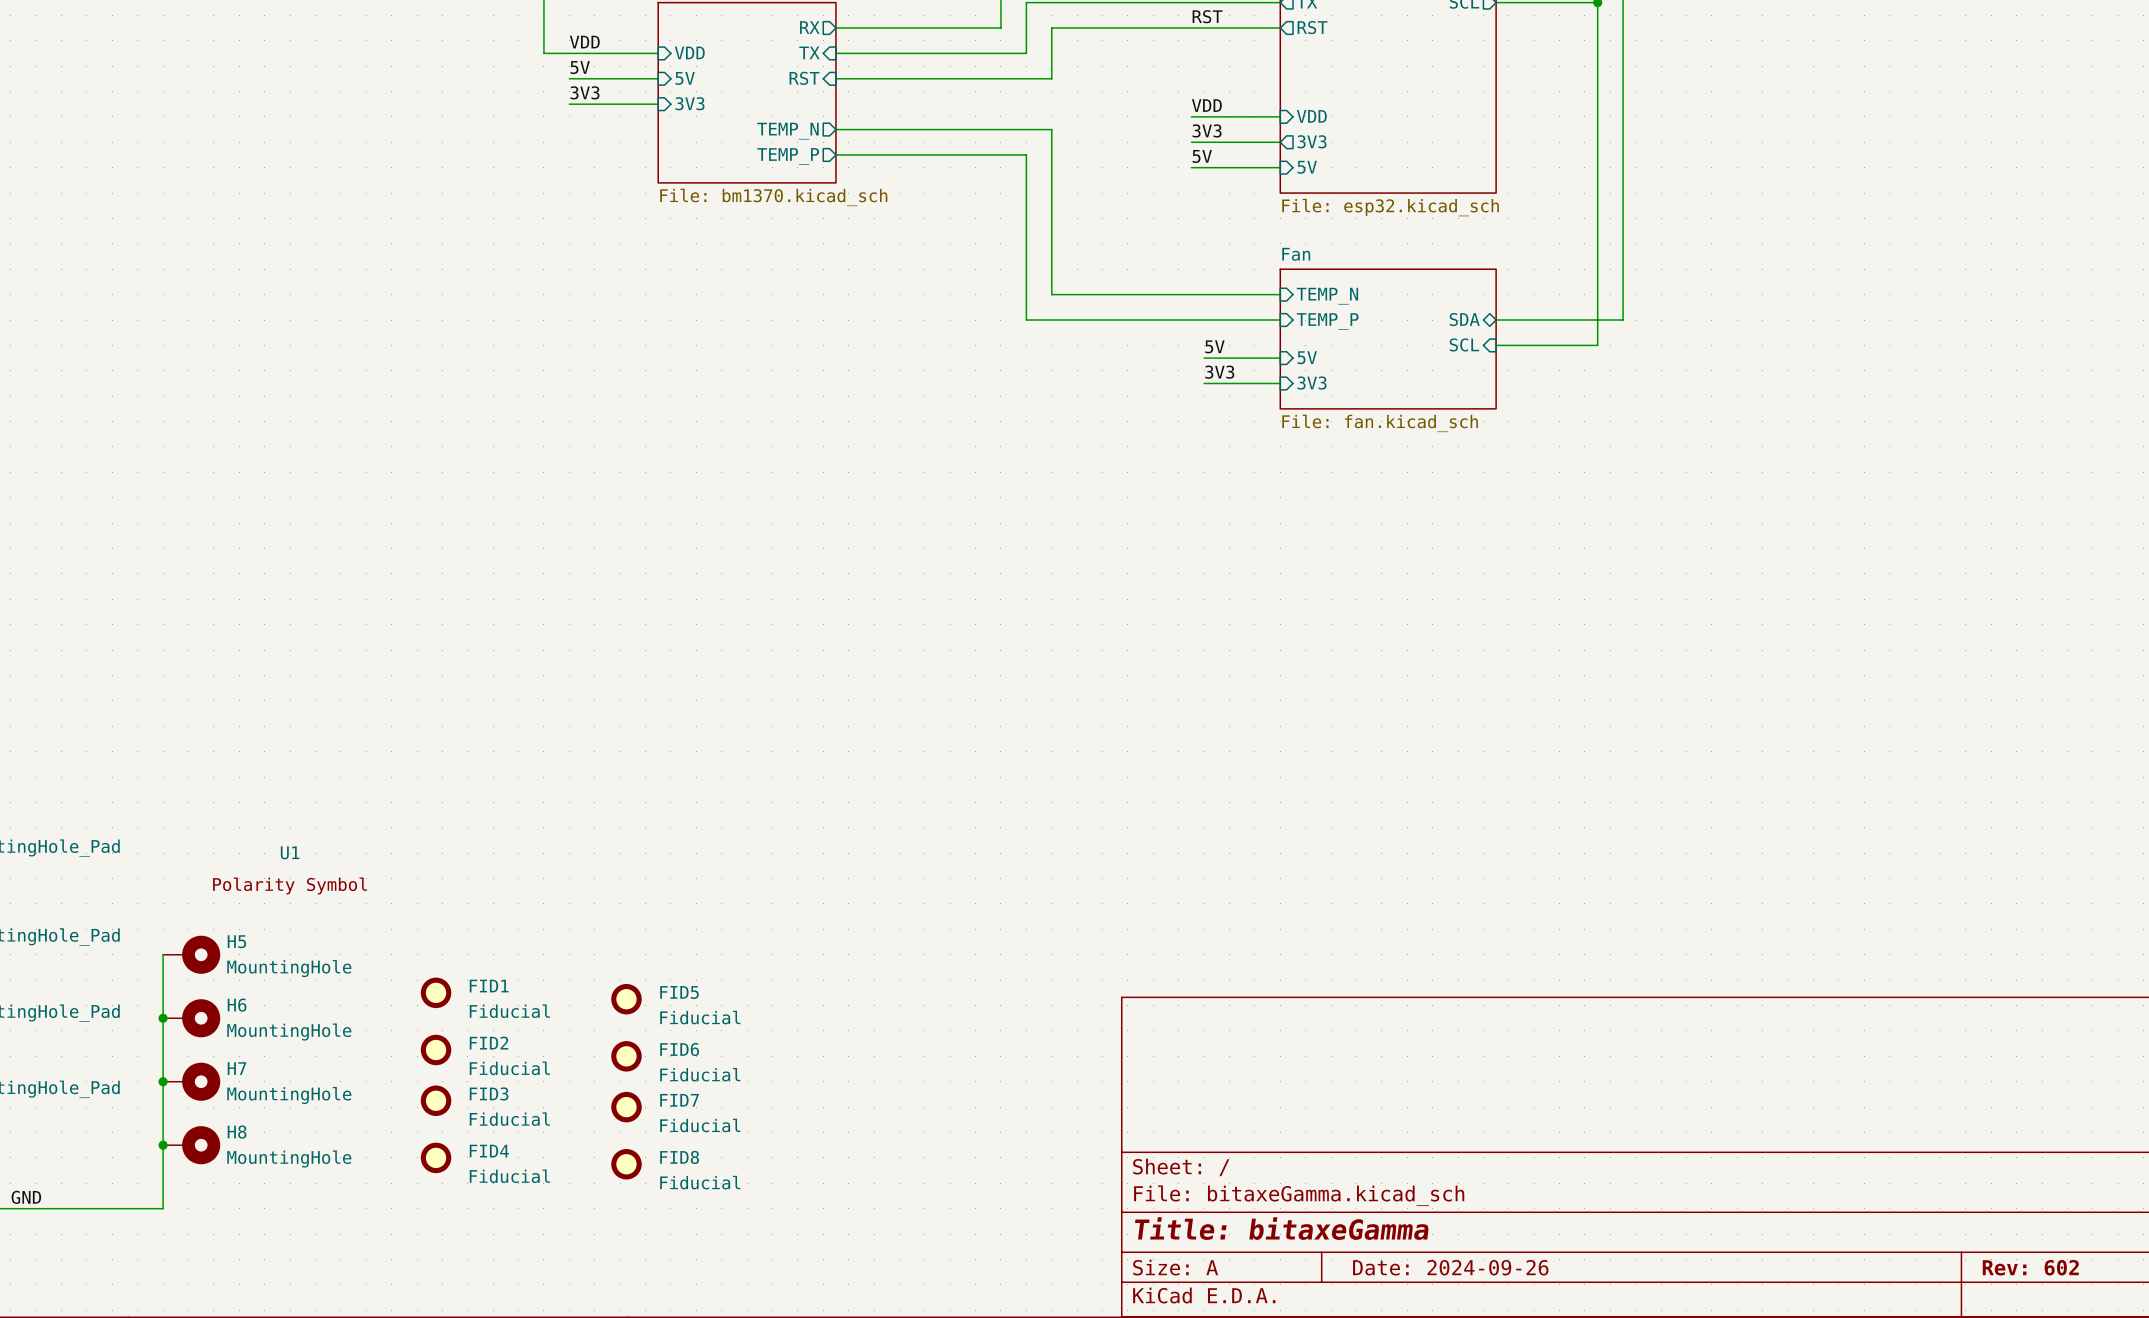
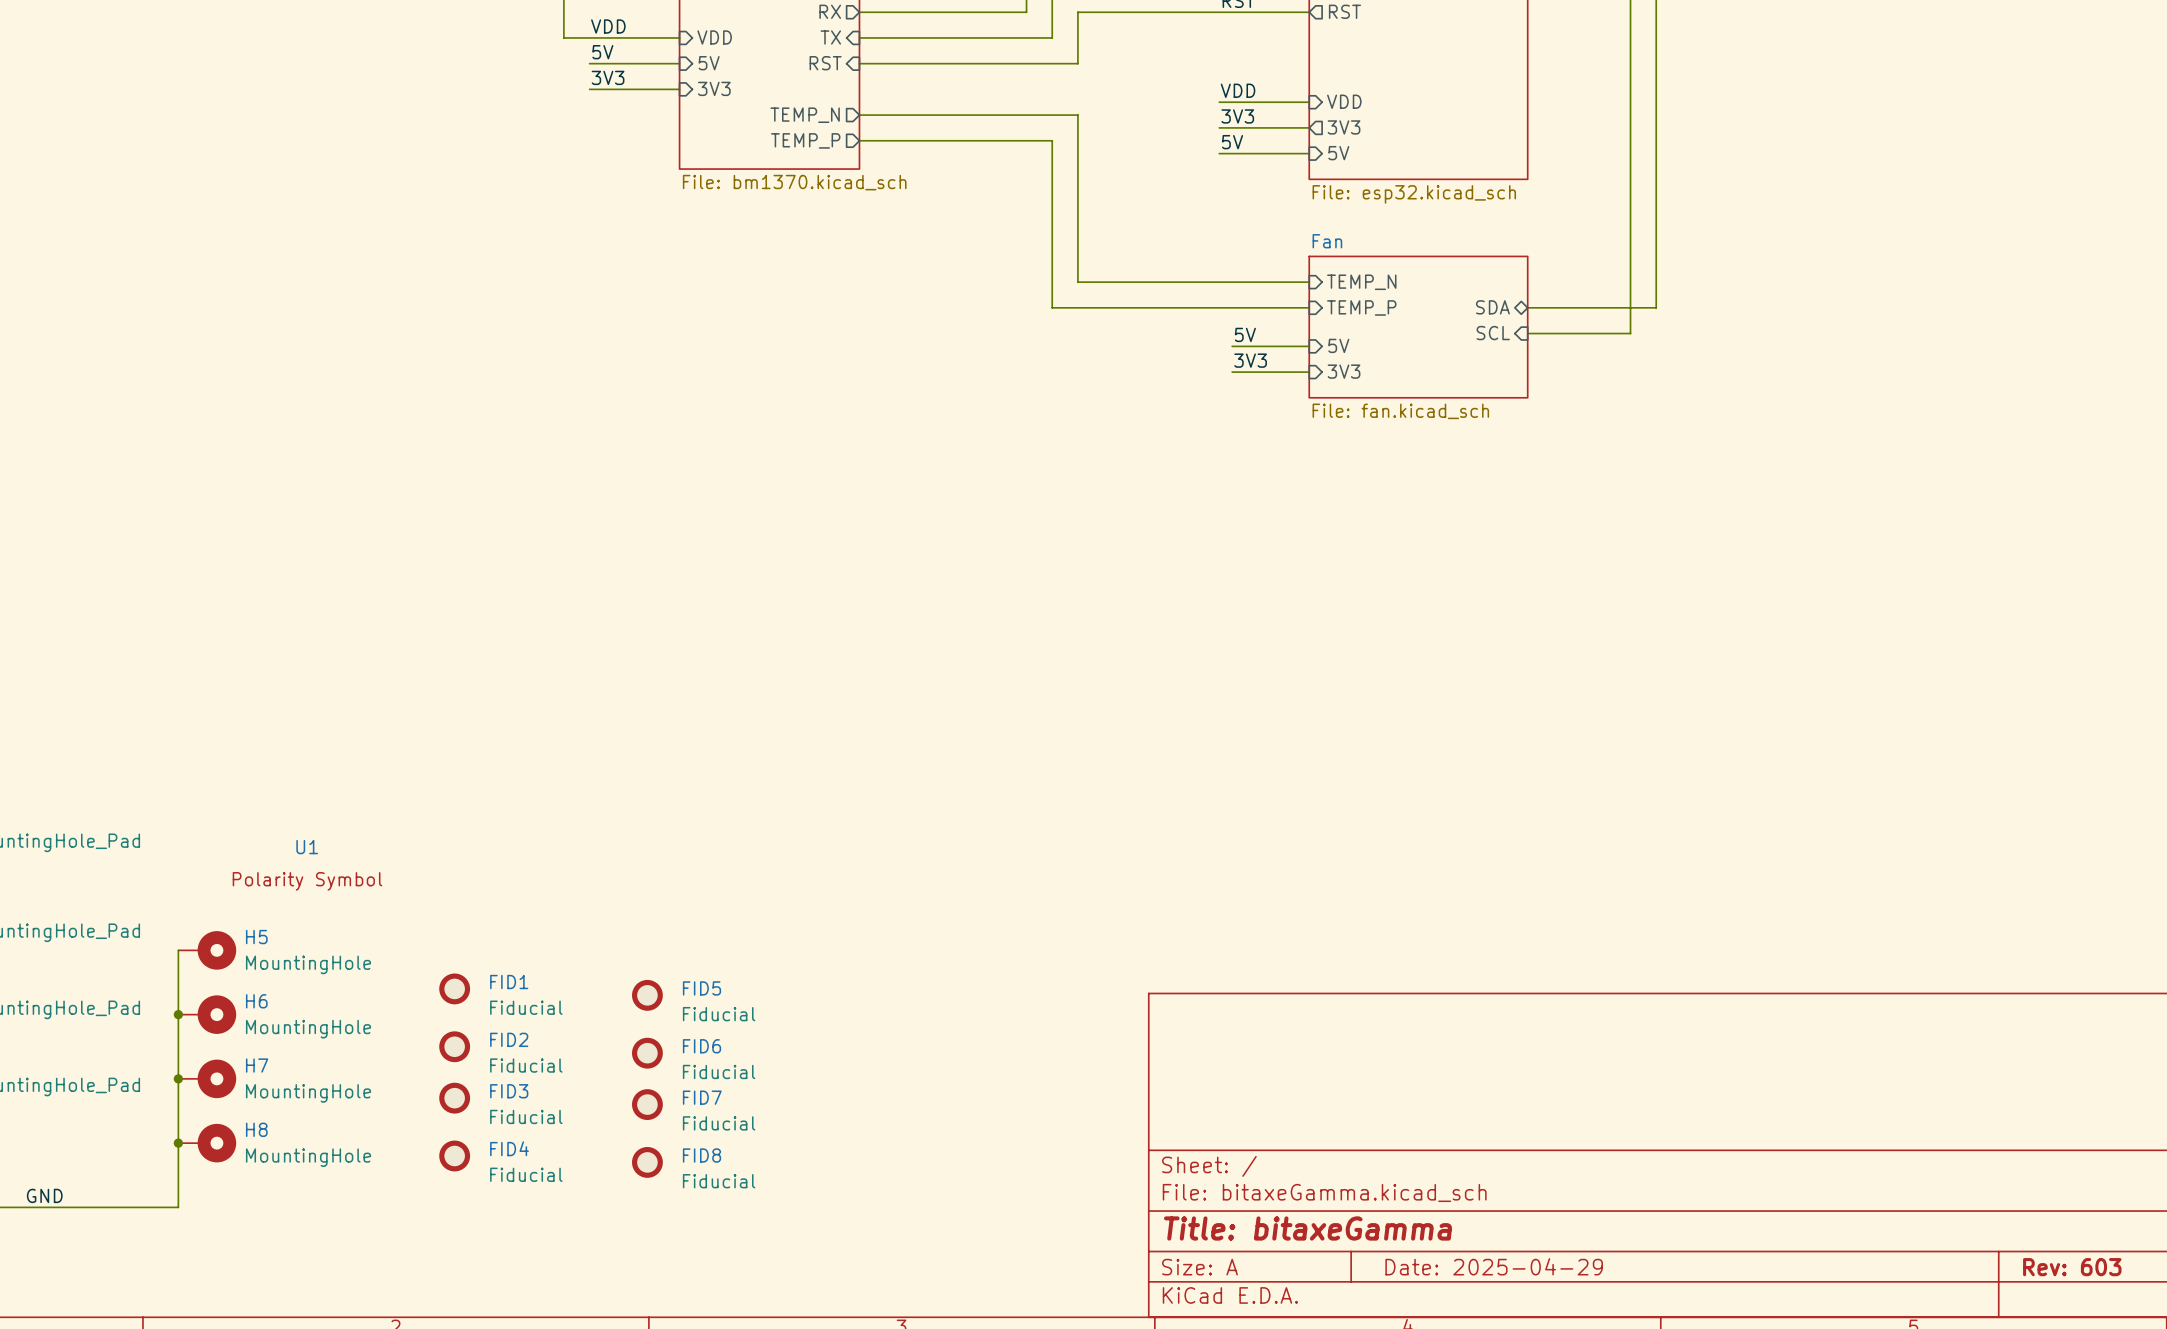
title block: Date: 2024-09-26 (1450, 1267) -> Date: 2025-04-29 (1494, 1266)
title block: Rev: 602 (2030, 1267) -> Rev: 603 (2072, 1267)

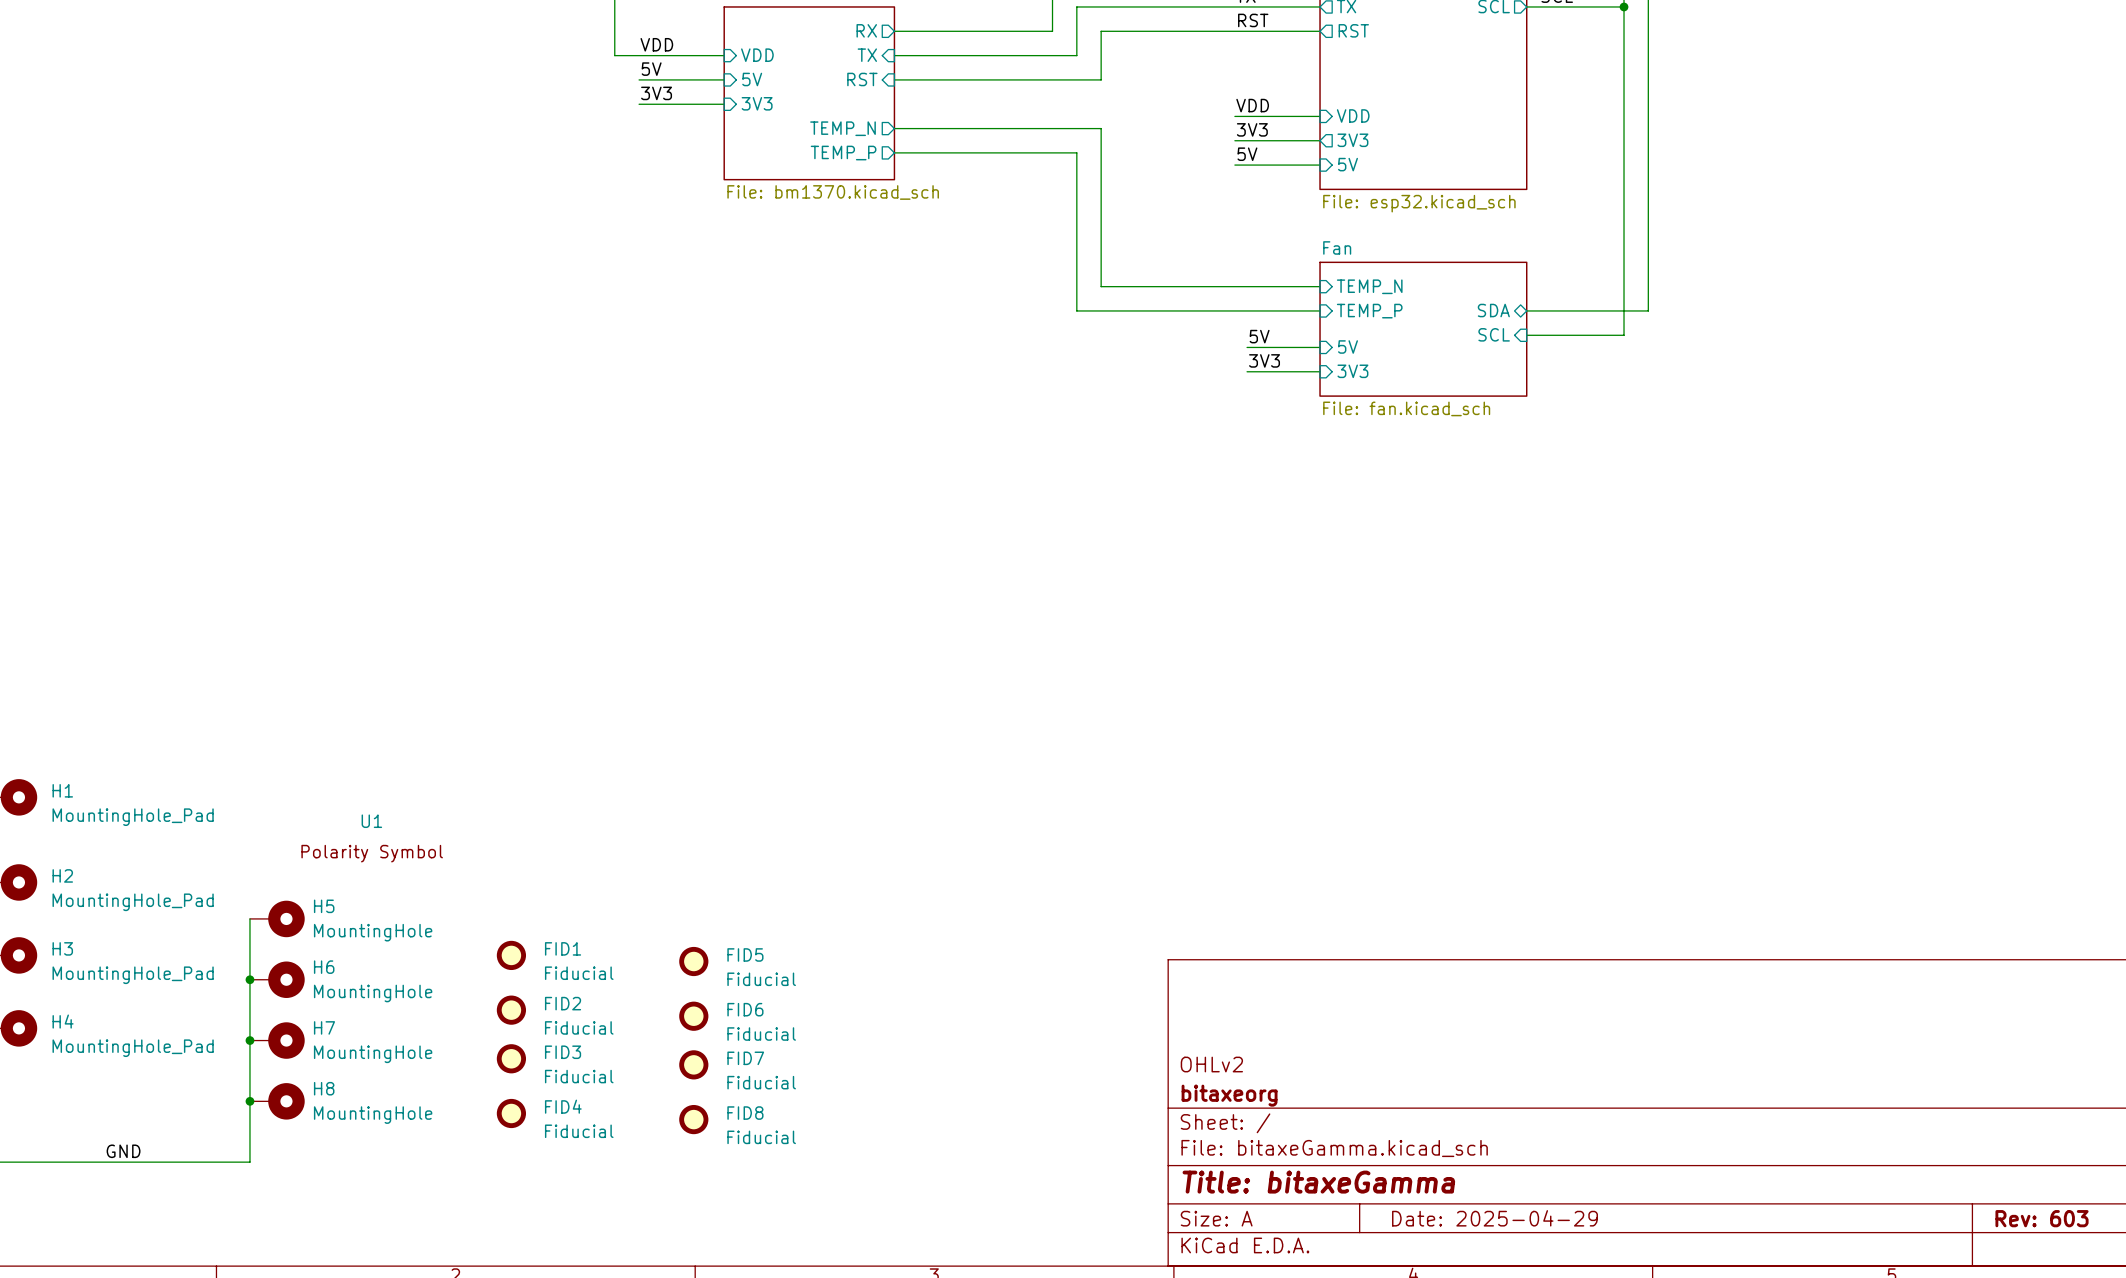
title block: none -> OHLv2 (1211, 1064)
title block: none -> bitaxeorg (1229, 1095)

